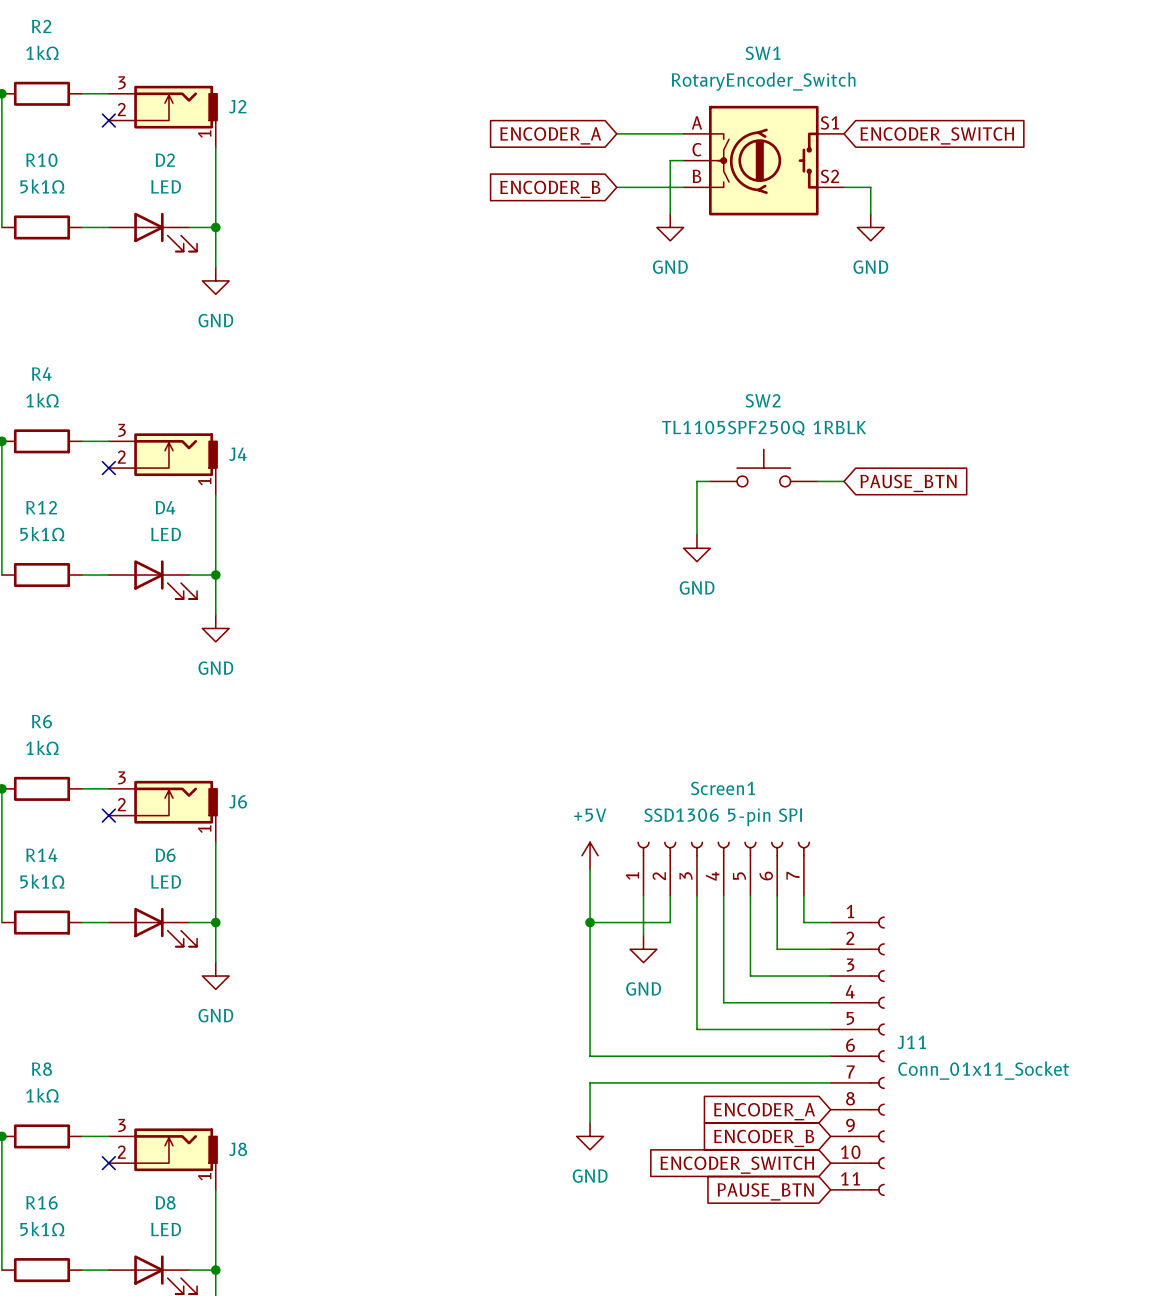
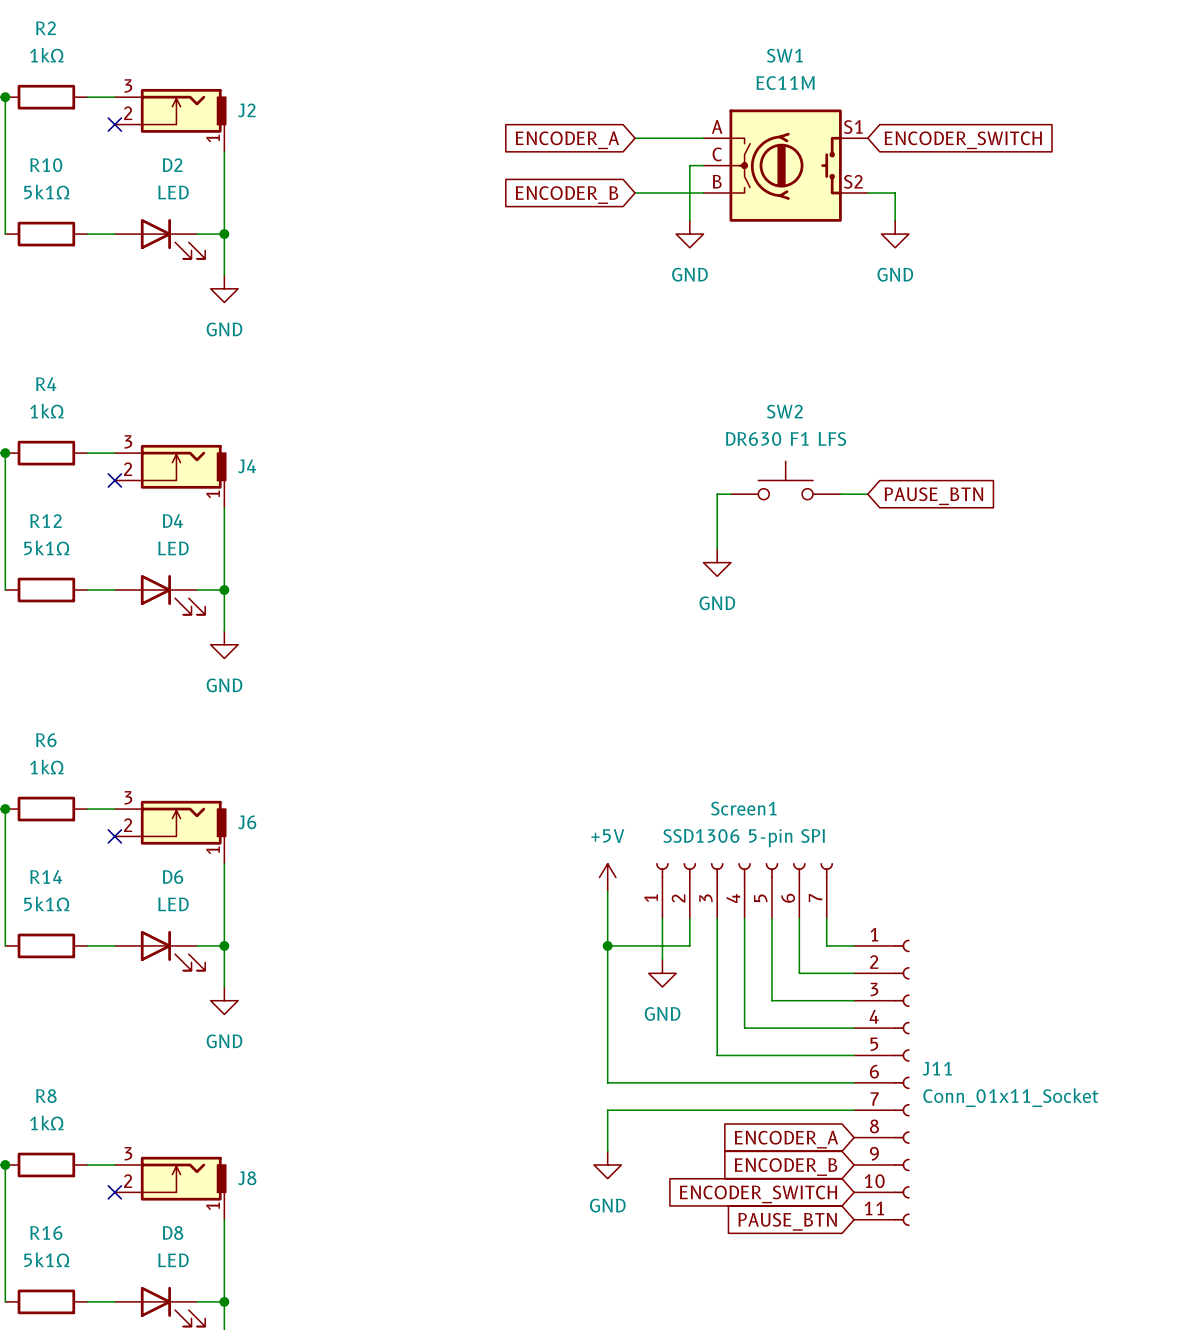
SW1 value: RotaryEncoder_Switch (763, 81) -> EC11M (785, 83)
SW2 value: TL1105SPF250Q 1RBLK (764, 428) -> DR630 F1 LFS (786, 438)

